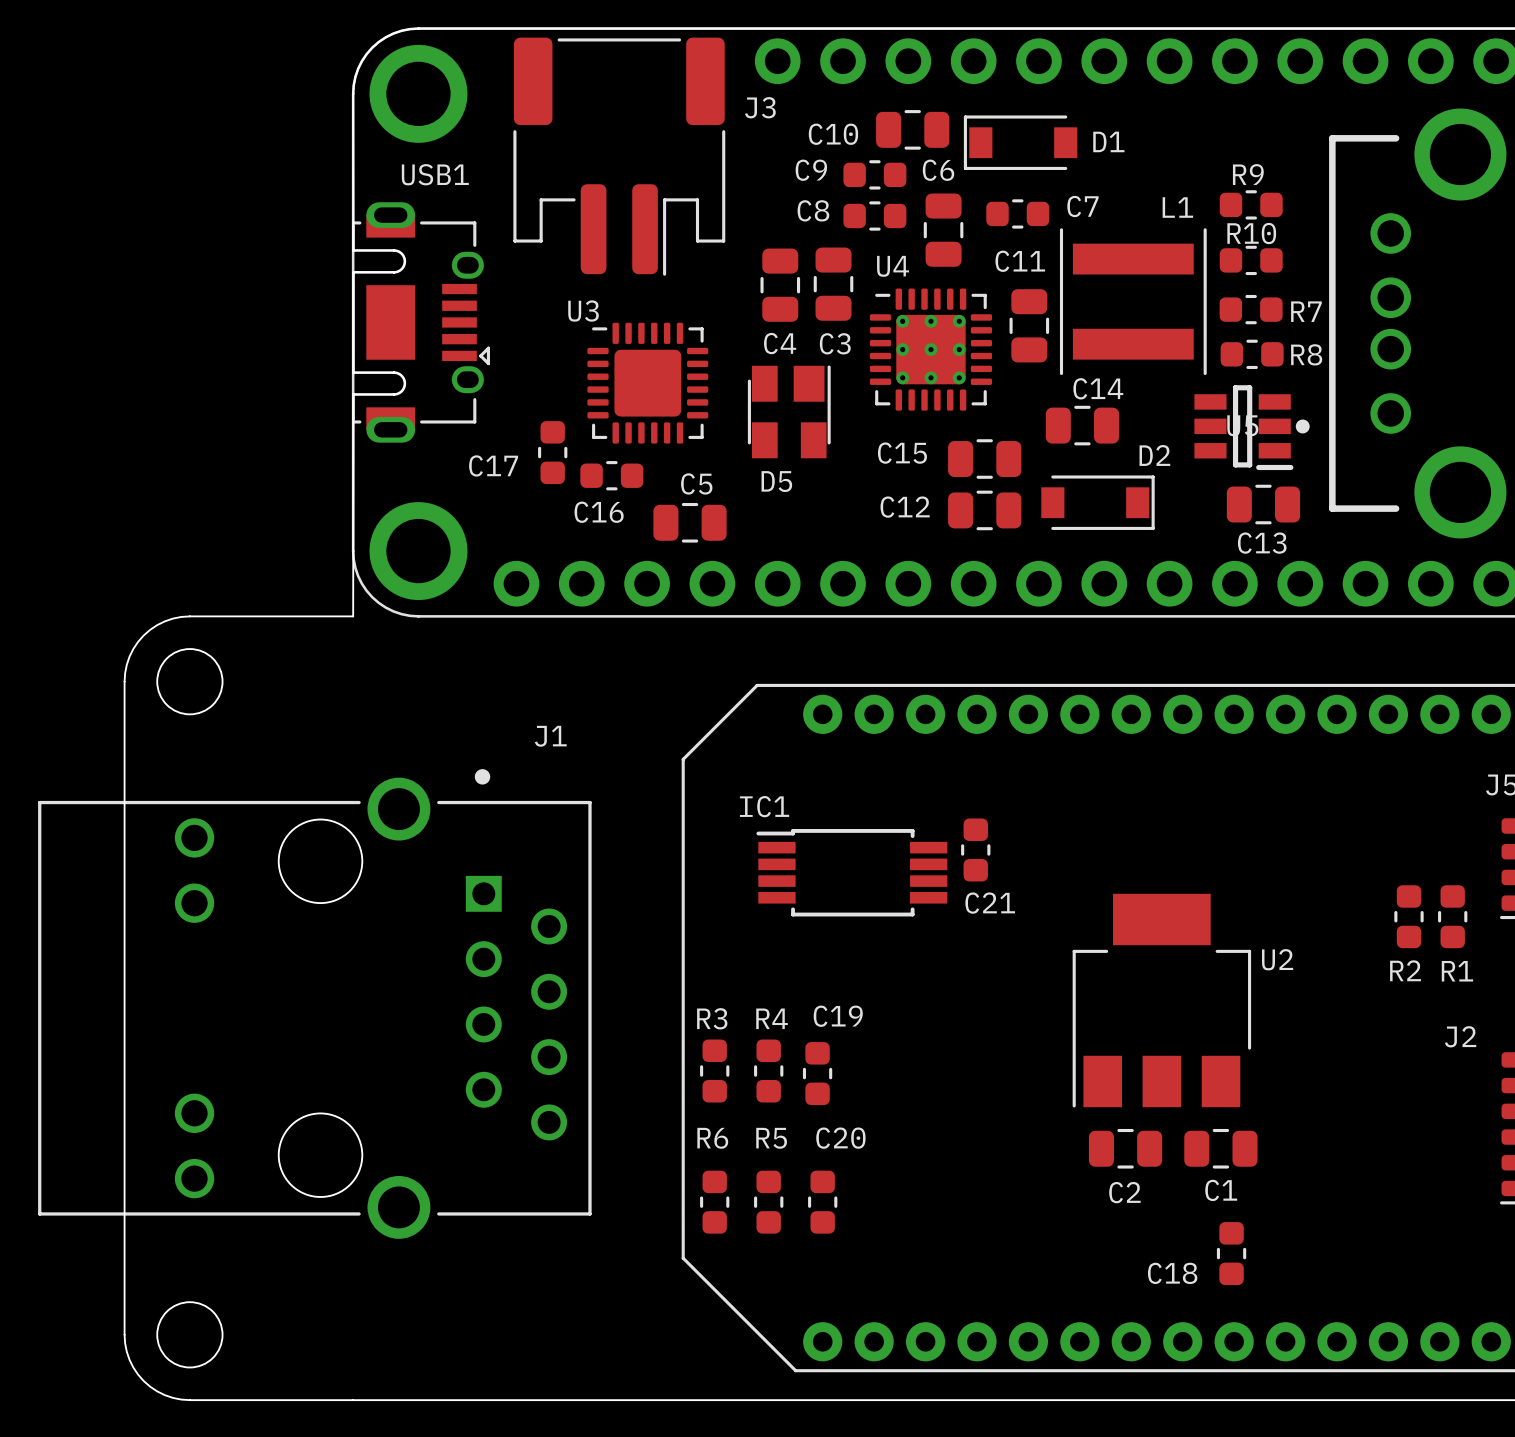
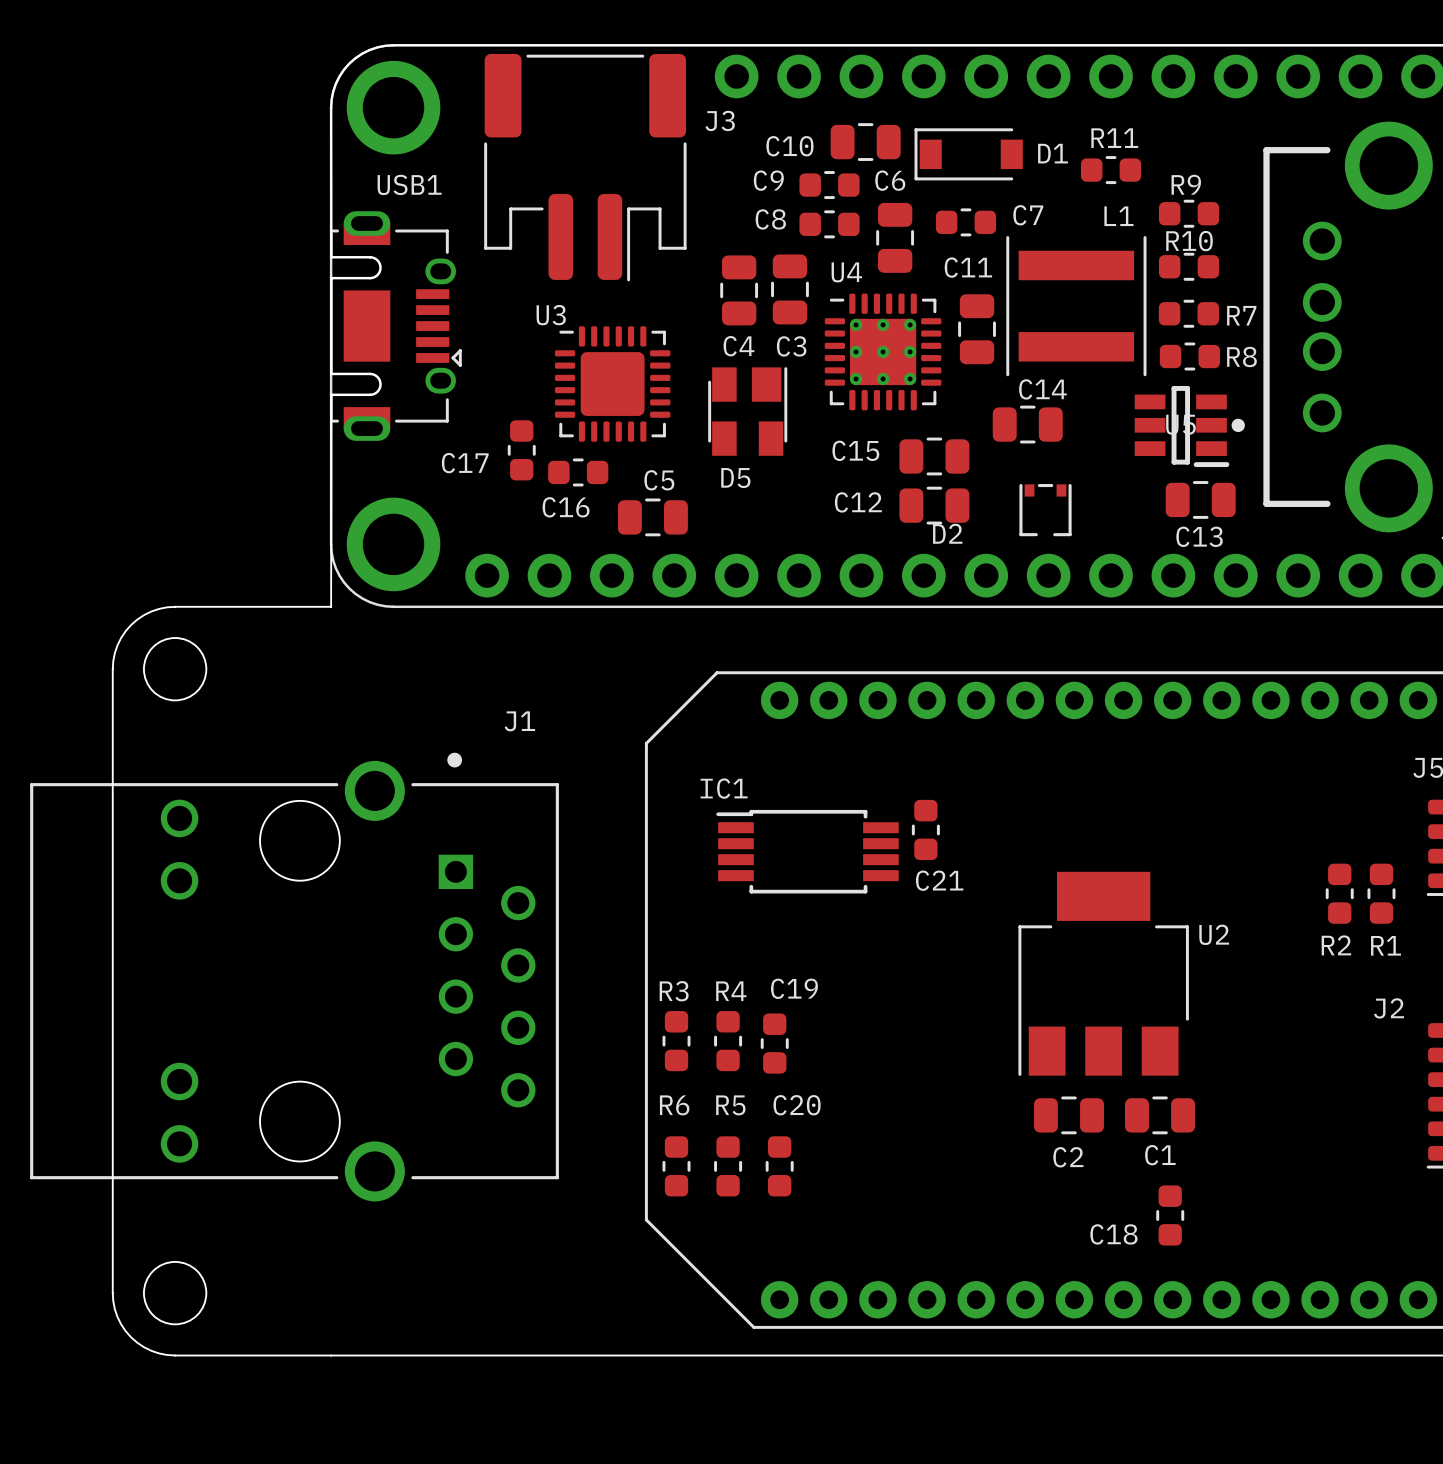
R11: none -> (1111, 170)
D2 name position: D2 (1154, 455) -> D2 (947, 533)
D2 footprint: [1041, 475, 1155, 530] -> [1019, 484, 1072, 537]

